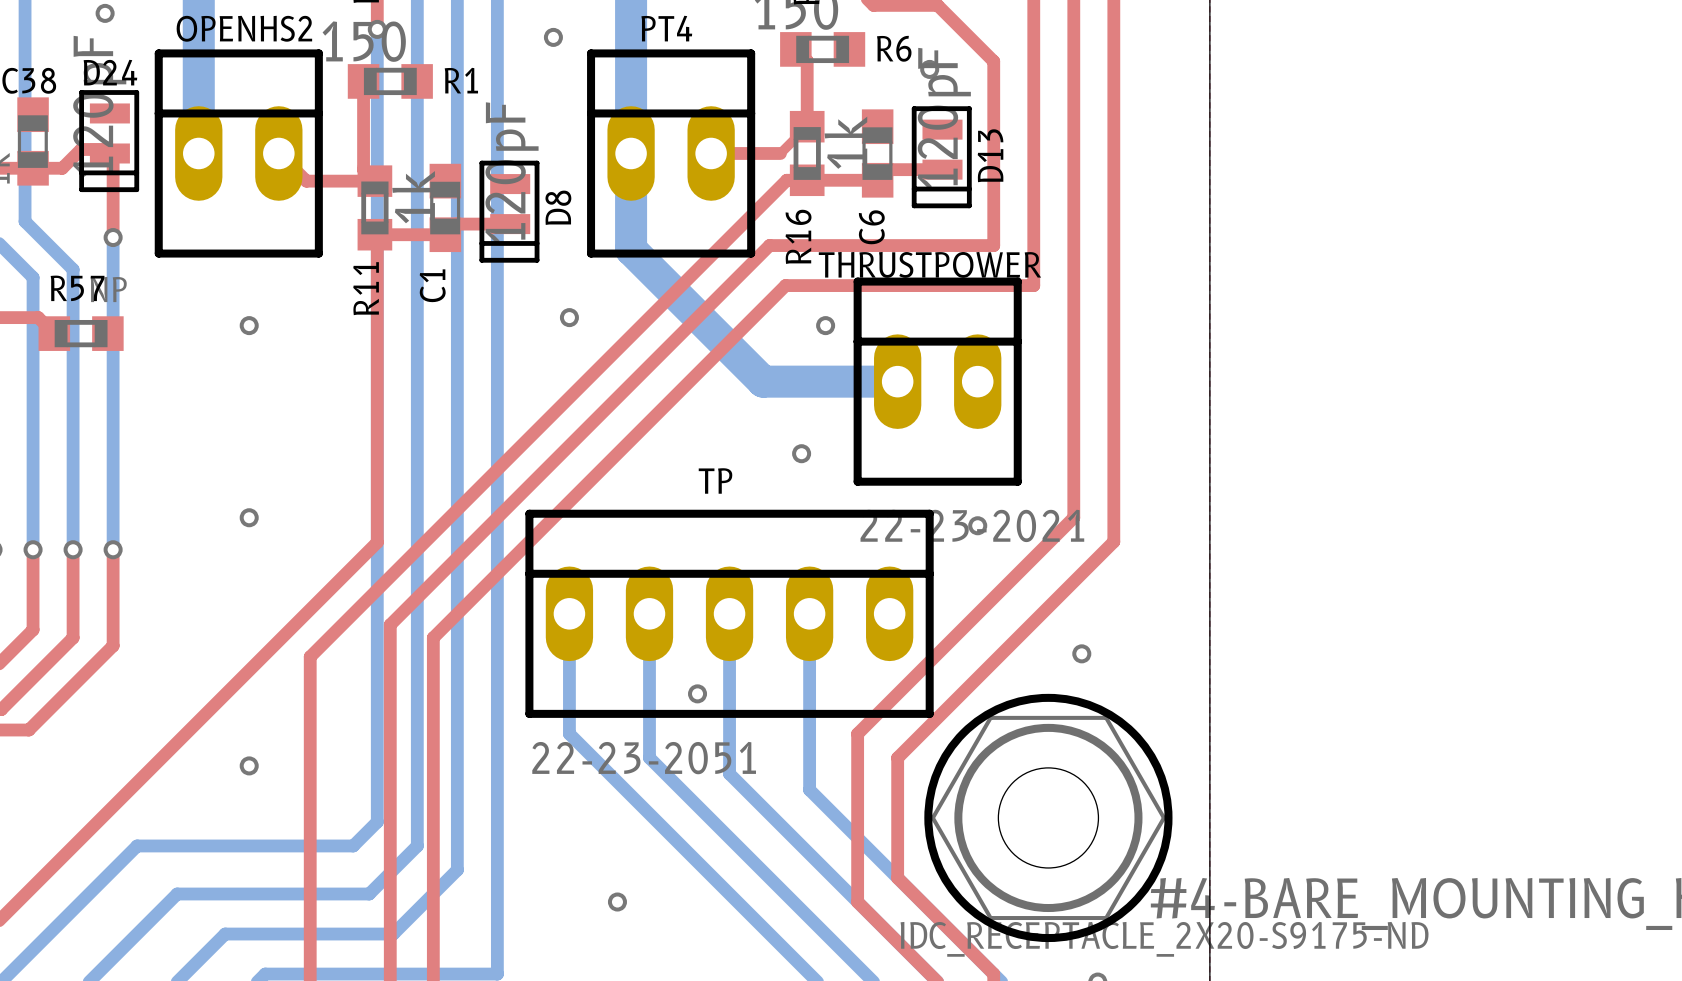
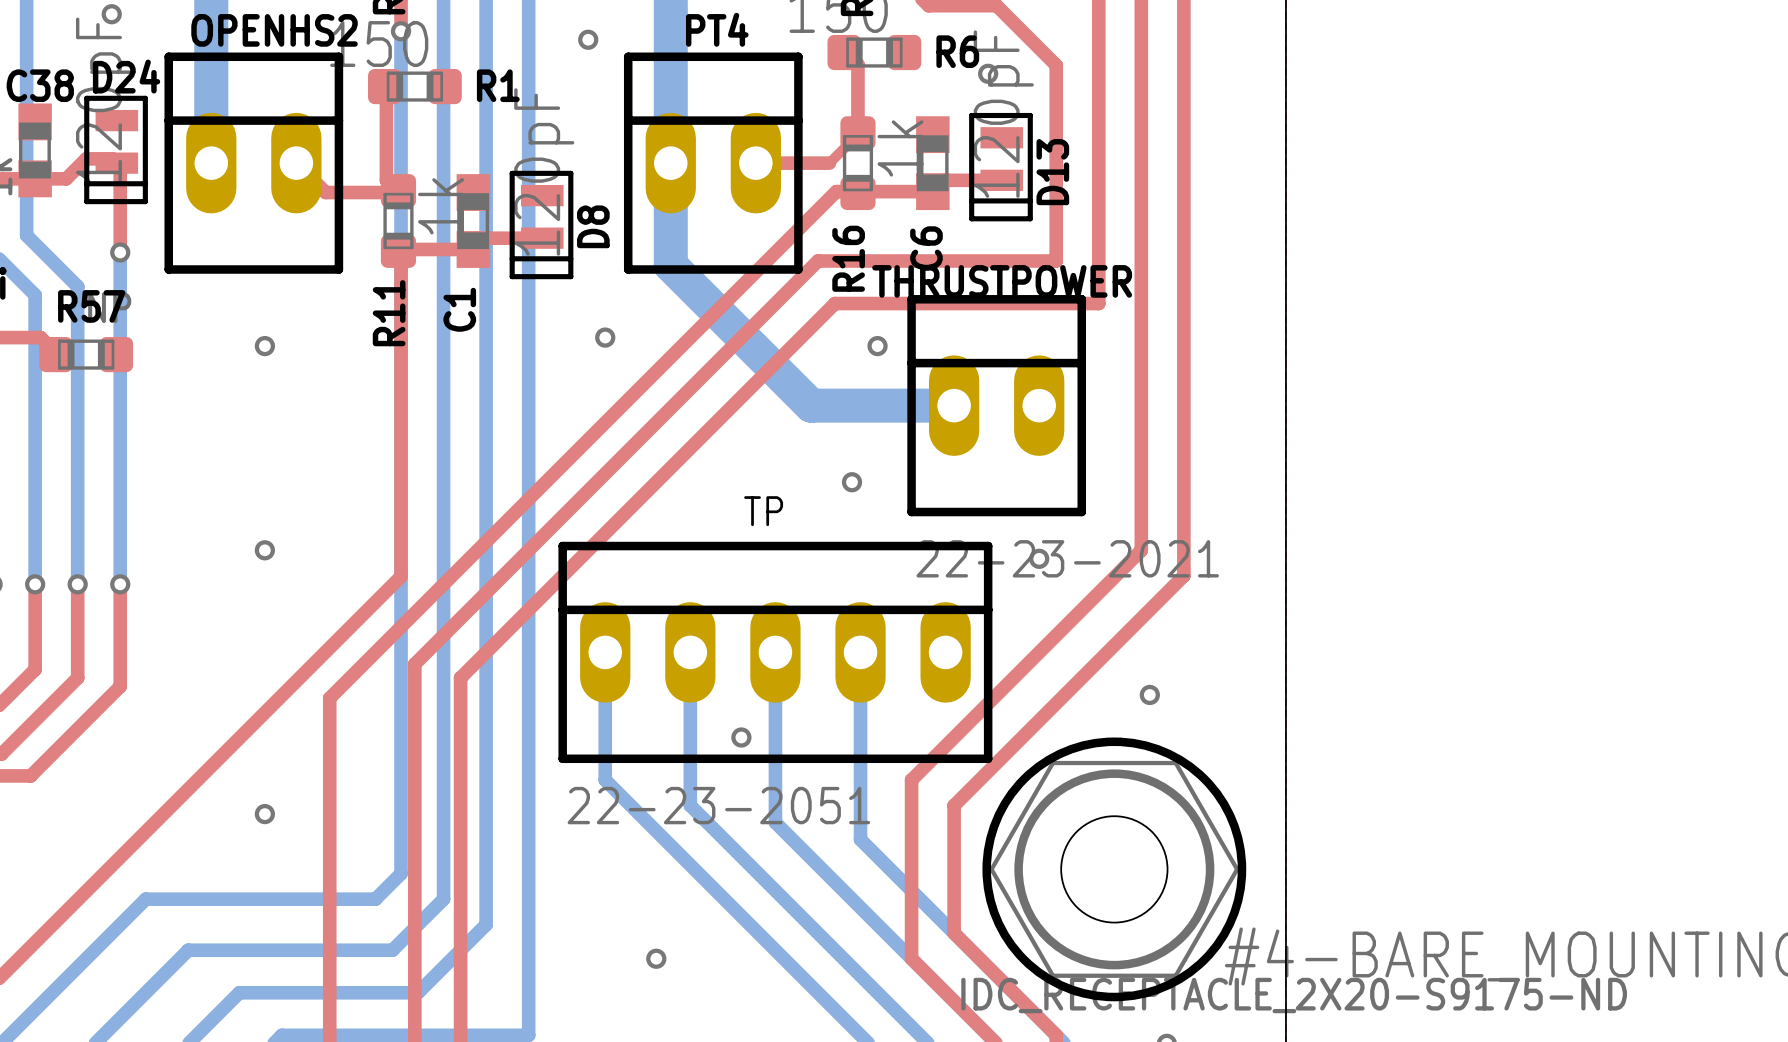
R6 footprint: [780, 32, 866, 67] -> [827, 34, 922, 71]
R1 footprint: [347, 64, 433, 99] -> [367, 68, 462, 105]
R16 footprint: [789, 110, 825, 197] -> [840, 116, 876, 211]
R11 footprint: [357, 165, 393, 251] -> [380, 174, 417, 268]
R57 footprint: [38, 316, 124, 351] -> [39, 337, 134, 373]

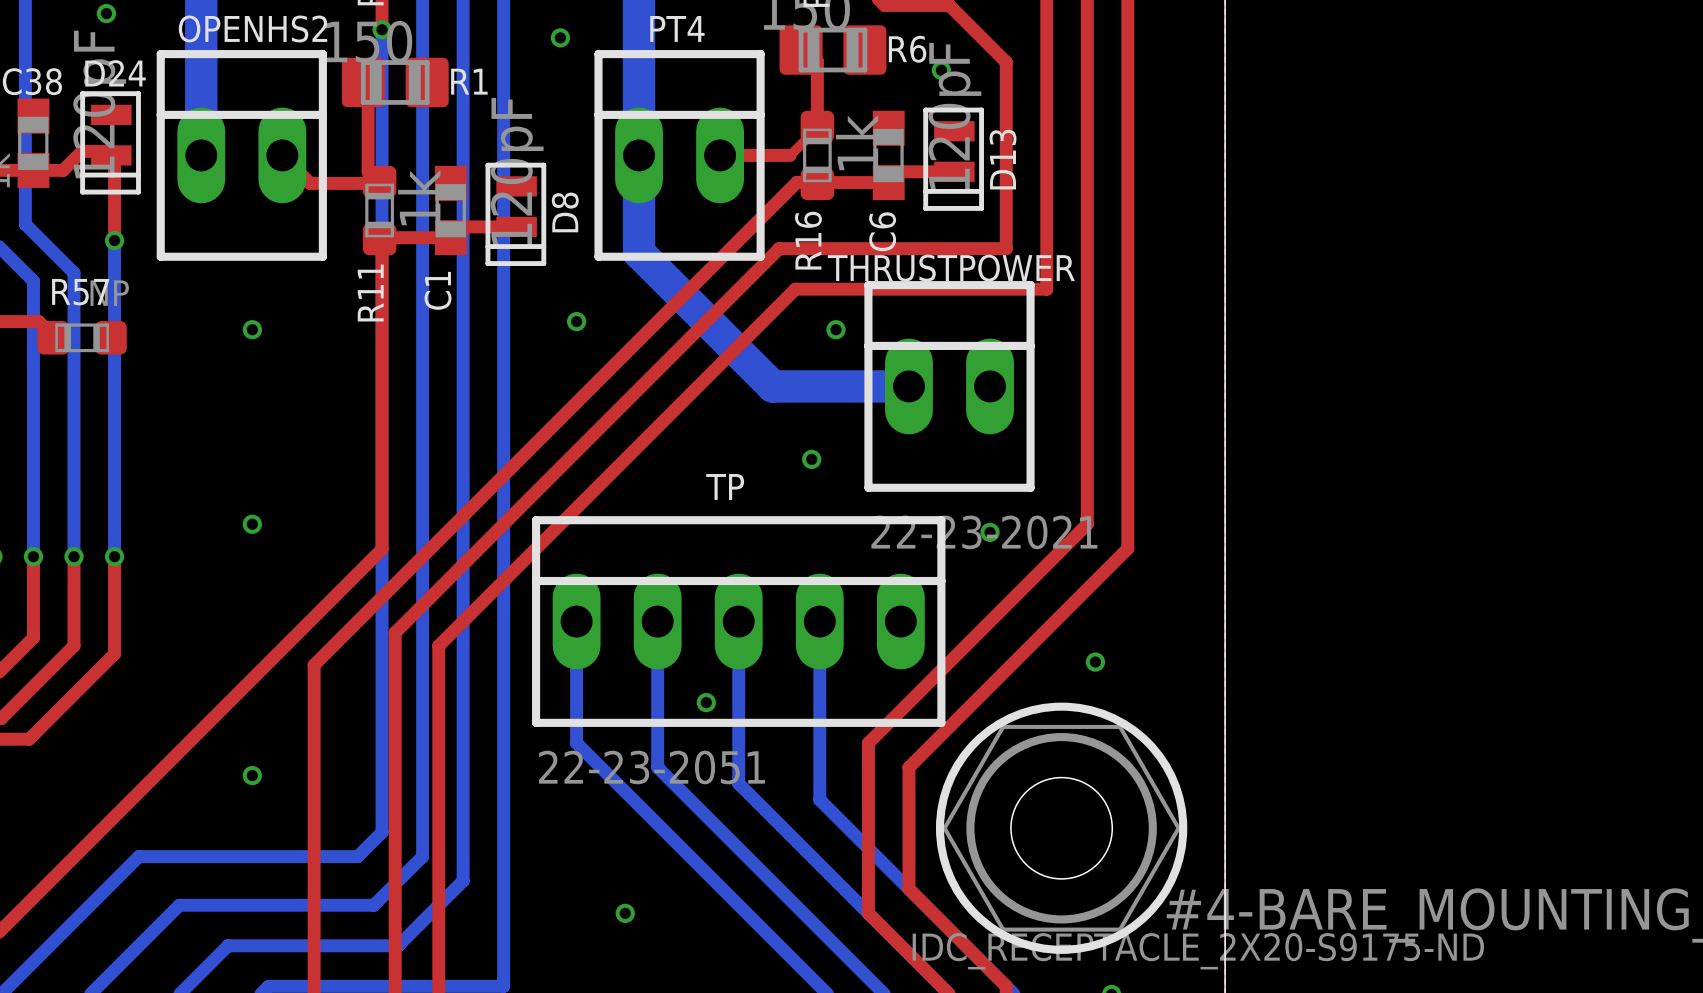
R6 footprint: [827, 34, 922, 71] -> [779, 25, 887, 75]
R1 footprint: [367, 68, 462, 105] -> [341, 57, 449, 108]

